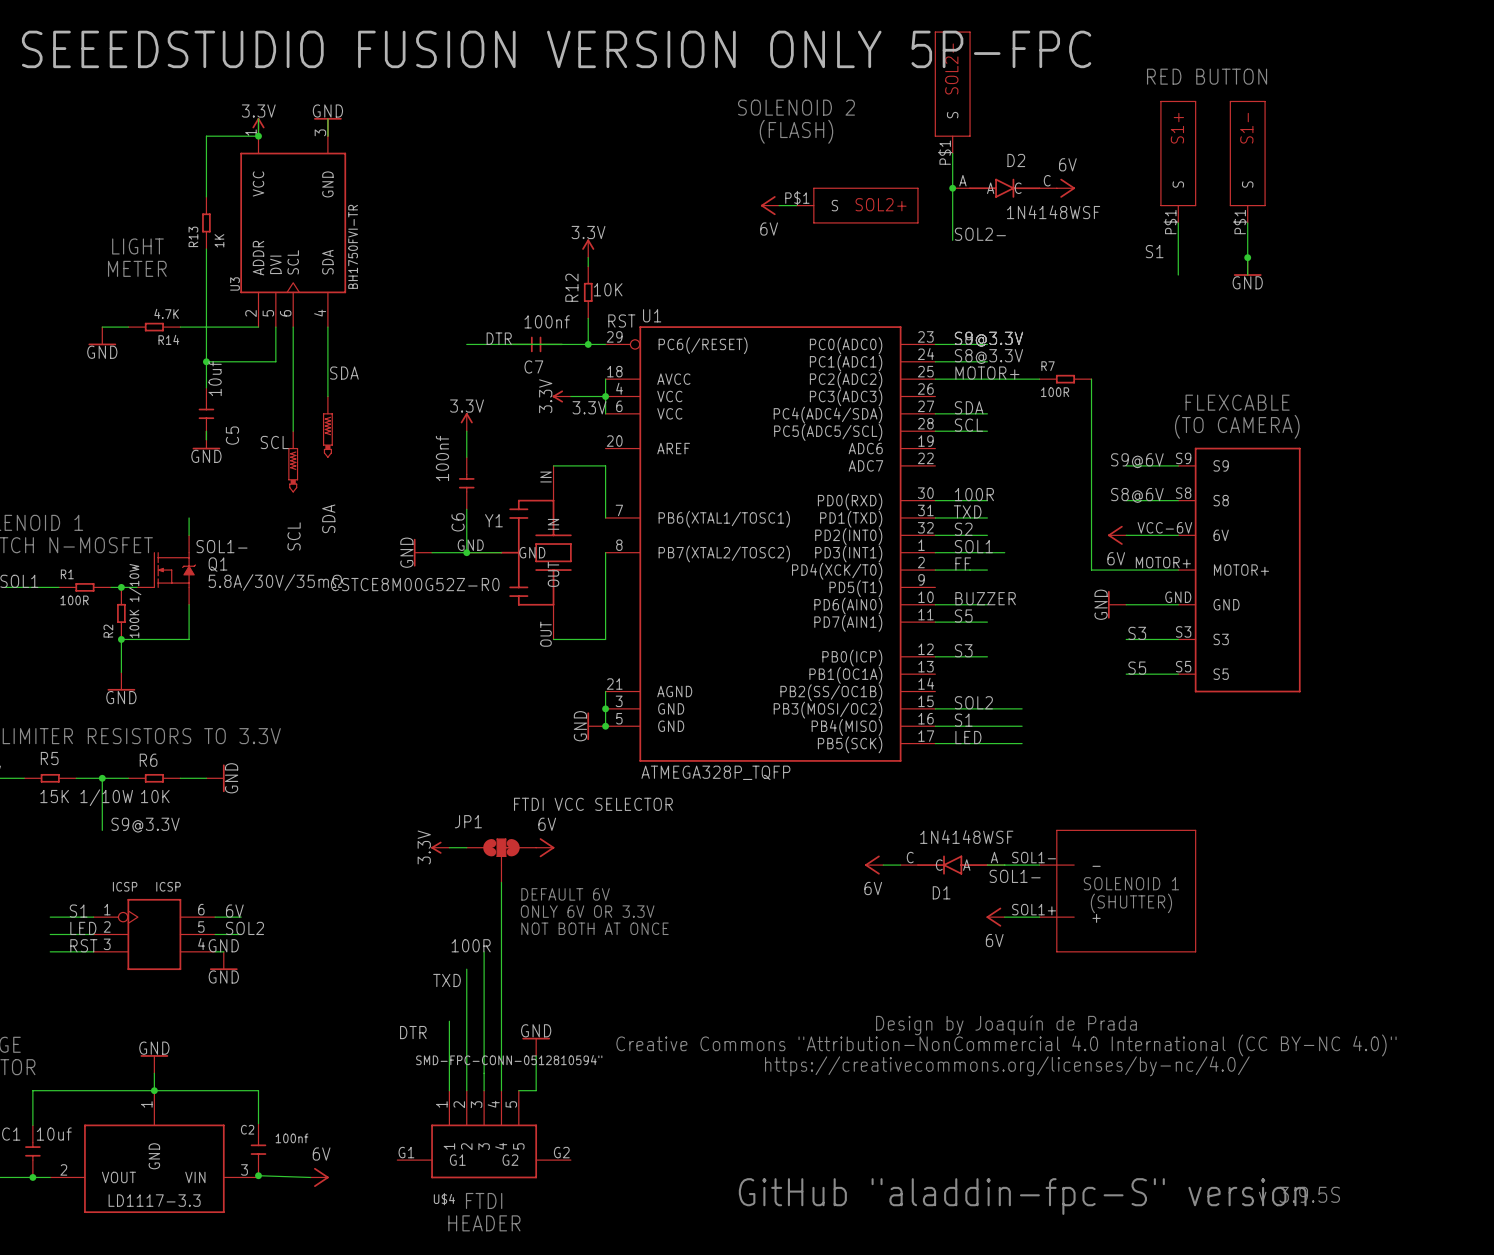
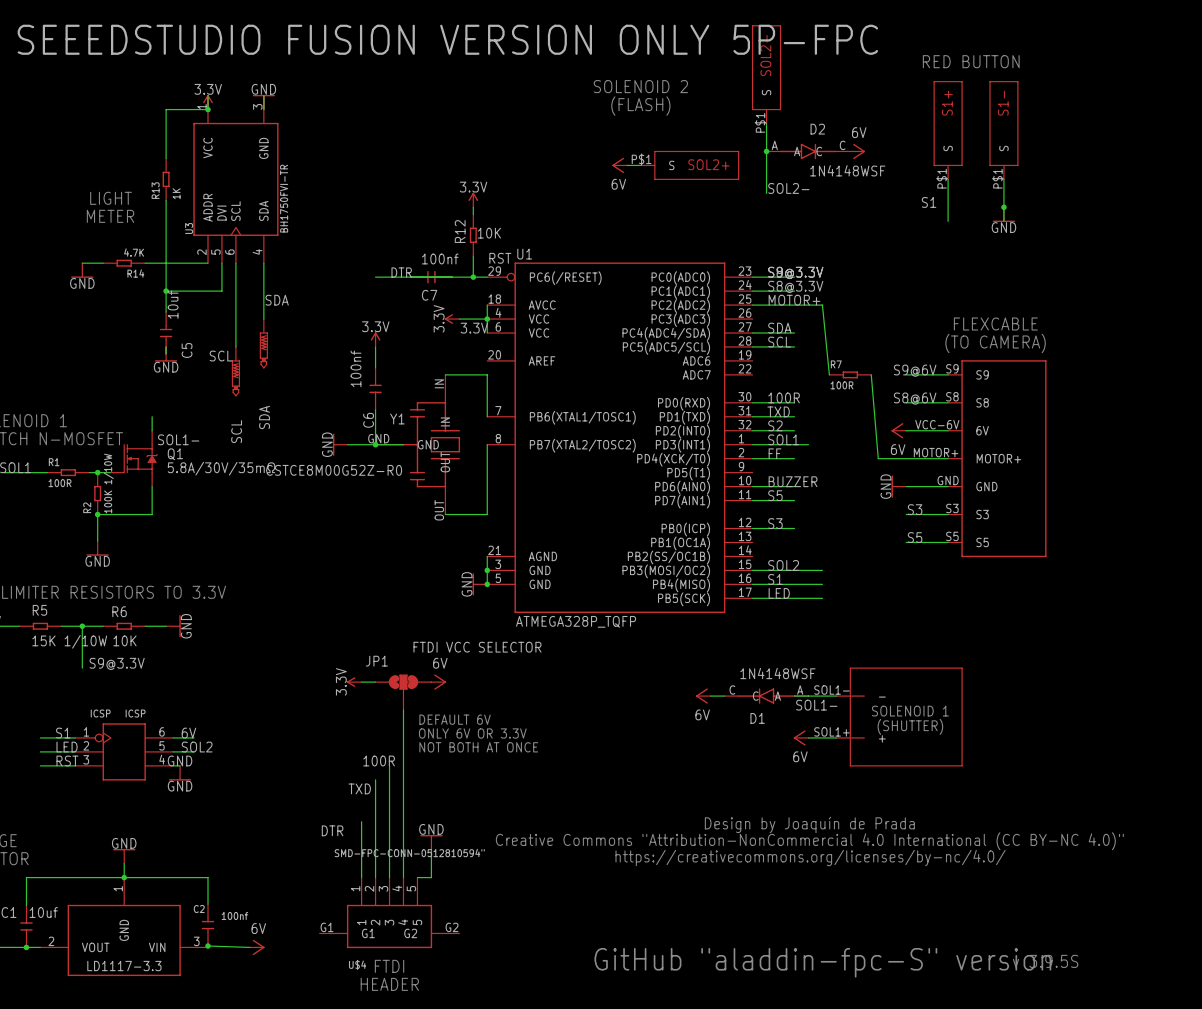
wire: (1022, 379) (1039, 379) -> (822, 305) (829, 374)
R7 position: (1065, 379) -> (850, 374)
wire: (1091, 379) (1091, 570) -> (871, 374) (878, 458)

